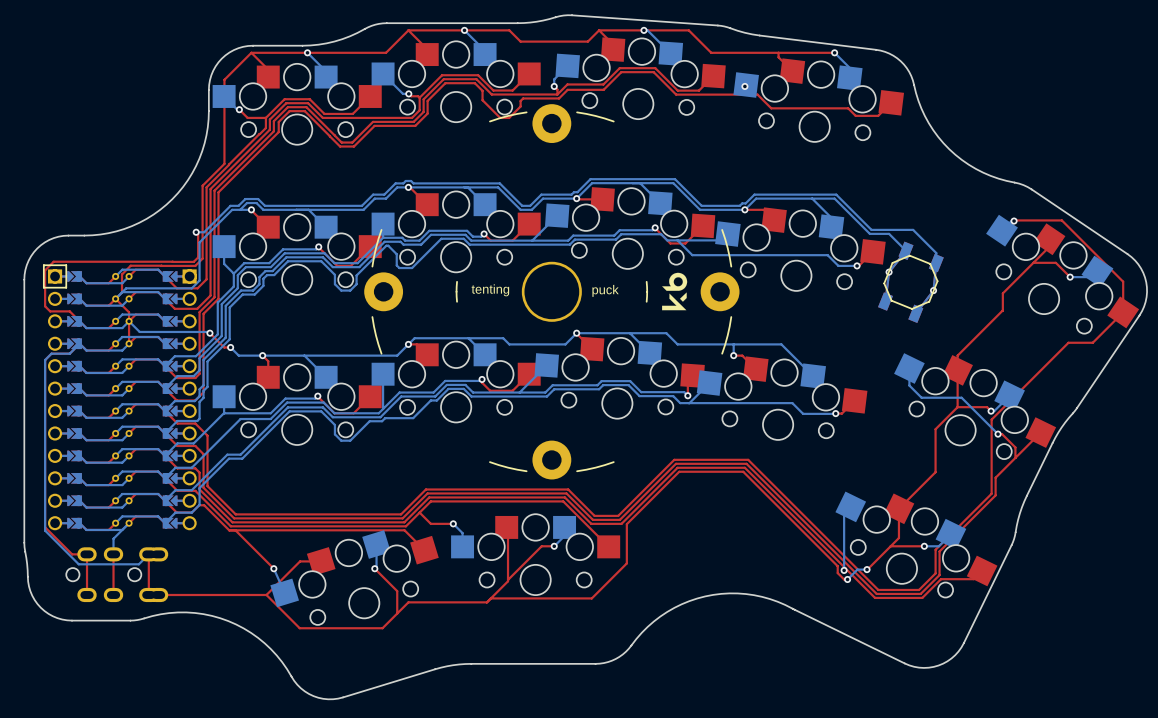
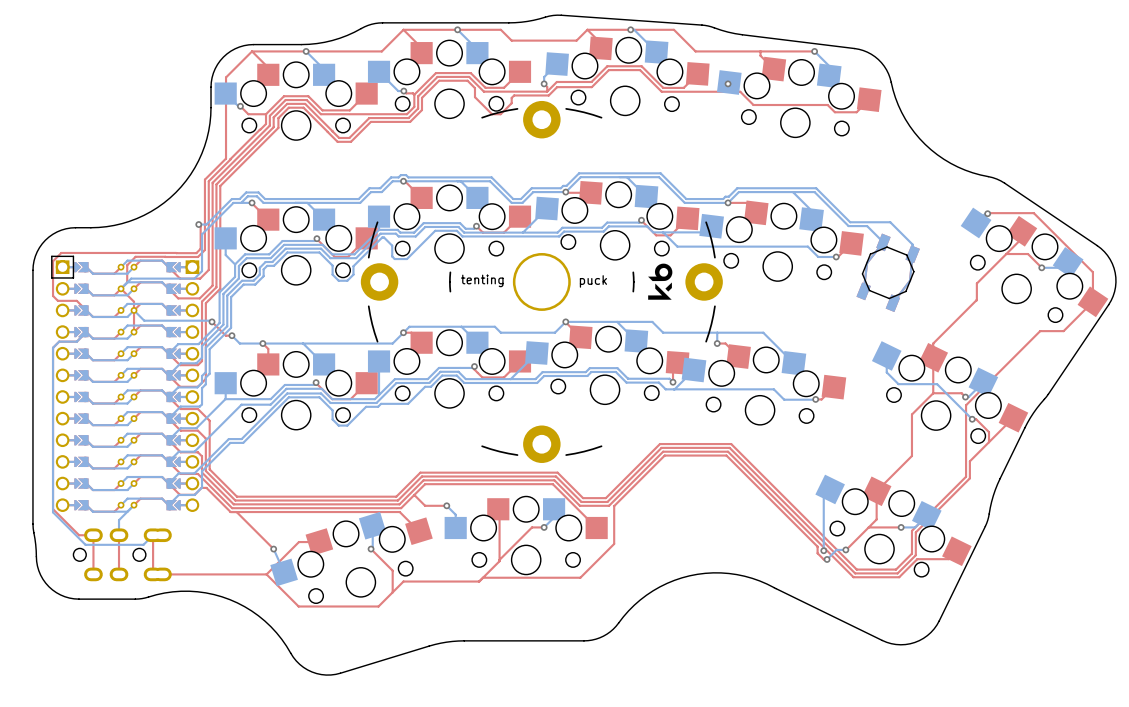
via: (889, 272) -> none
via: (933, 290) -> none

